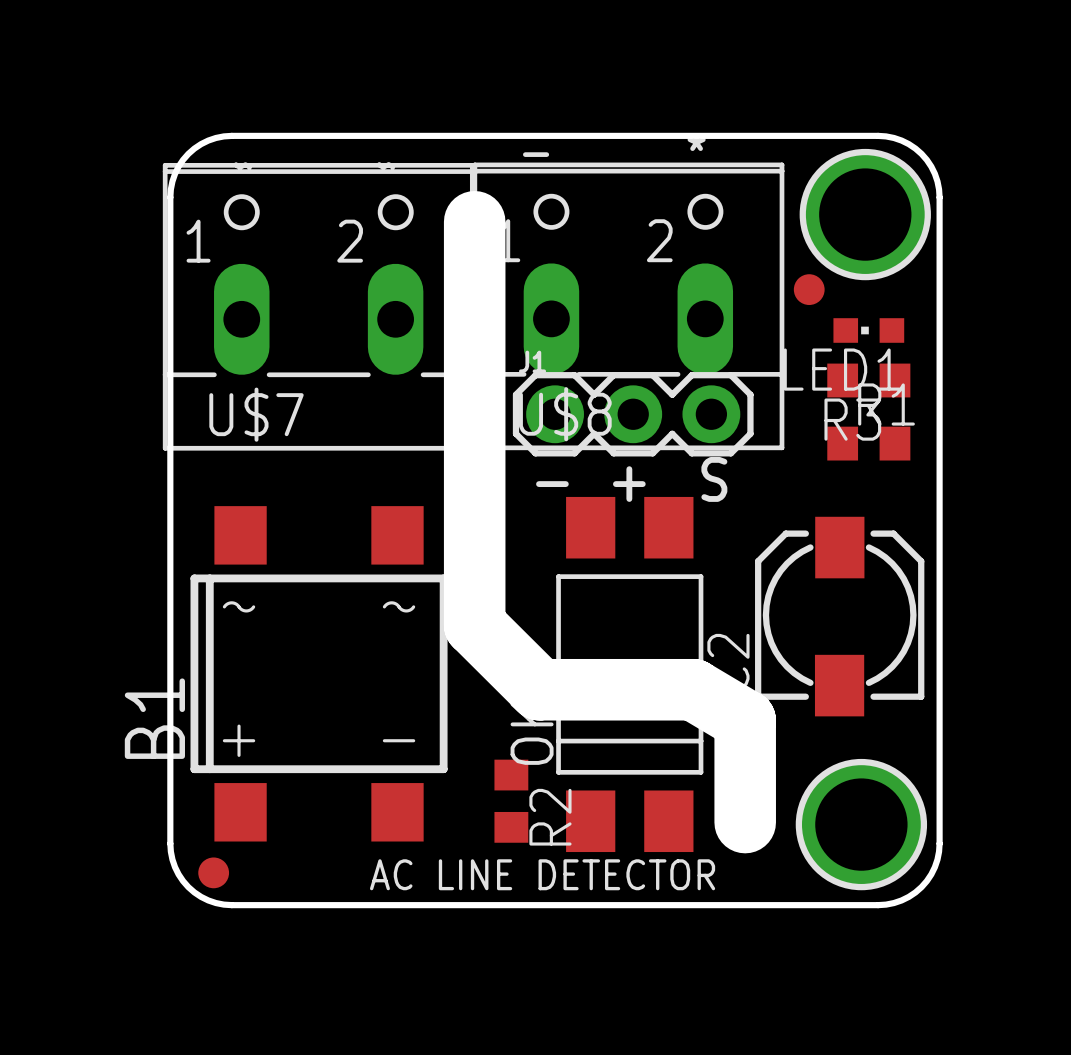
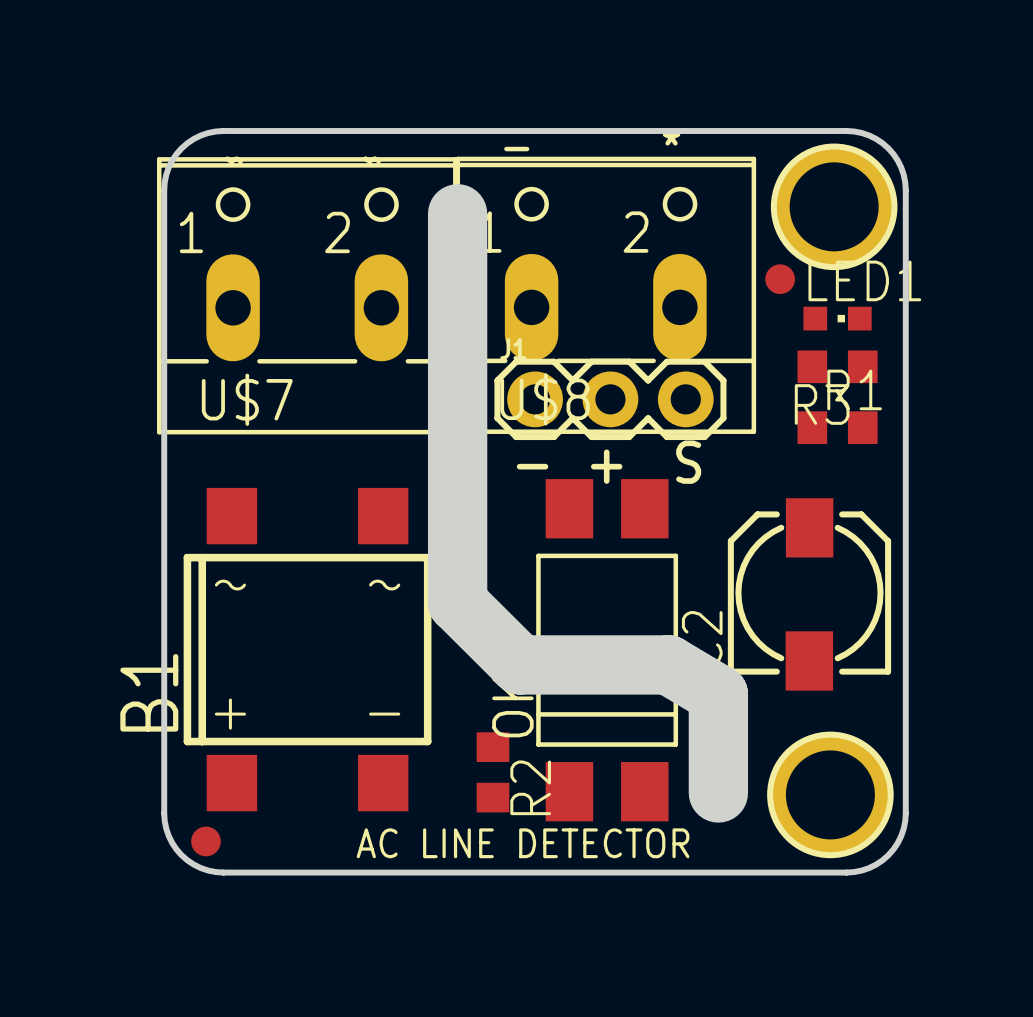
LED1 rotation: 0° (868, 330) -> 180° (837, 318)

